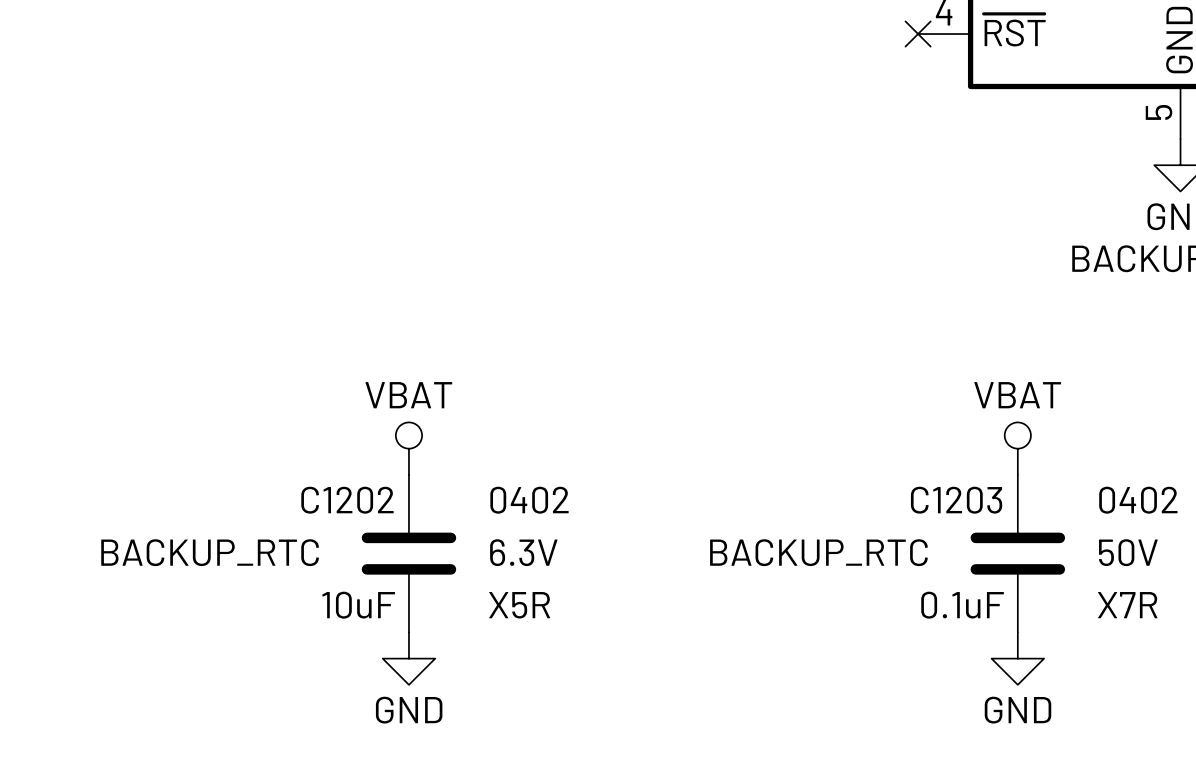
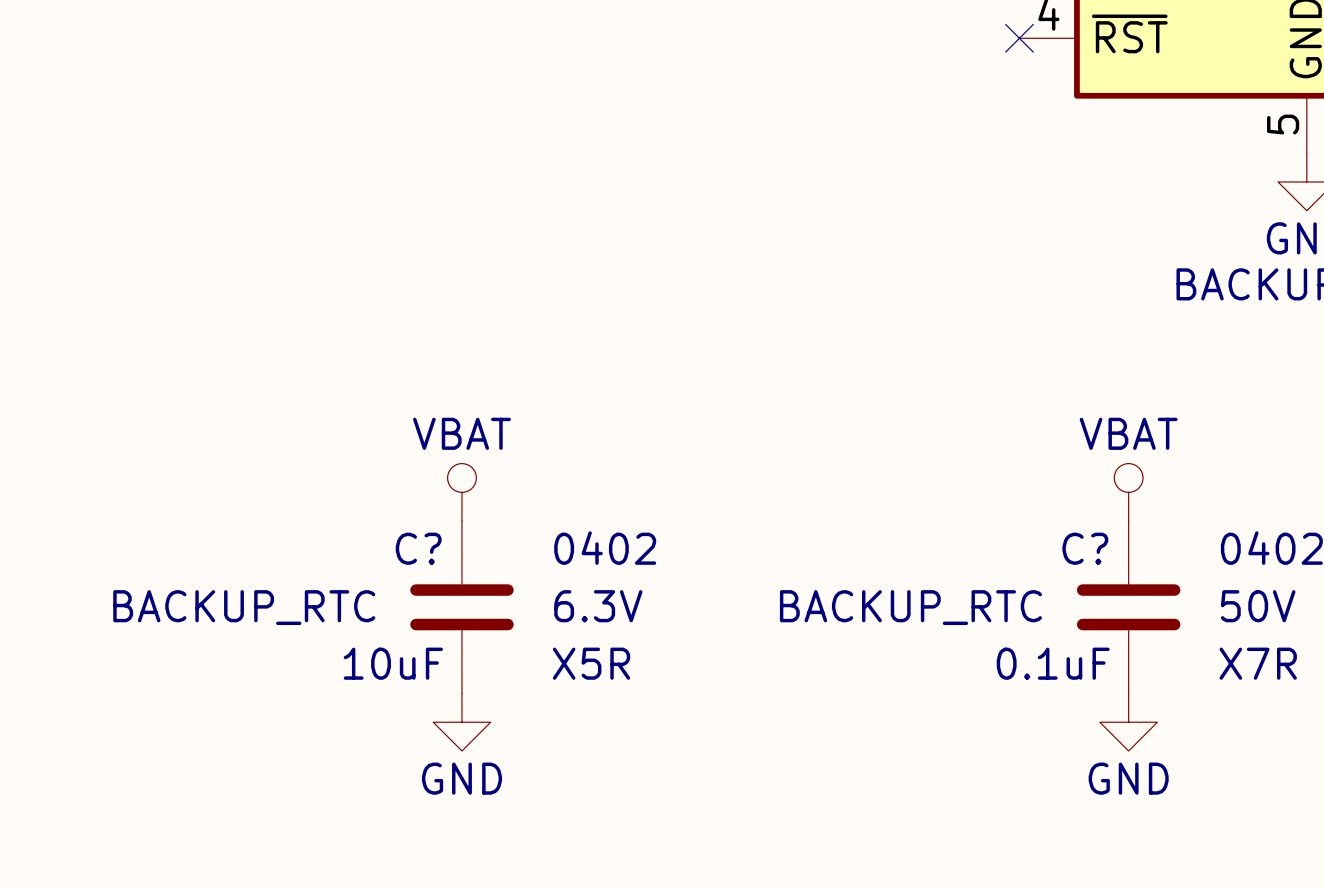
C1202 name: C1202 (347, 500) -> C? (418, 548)
C1203 name: C1203 (956, 500) -> C? (1085, 548)

